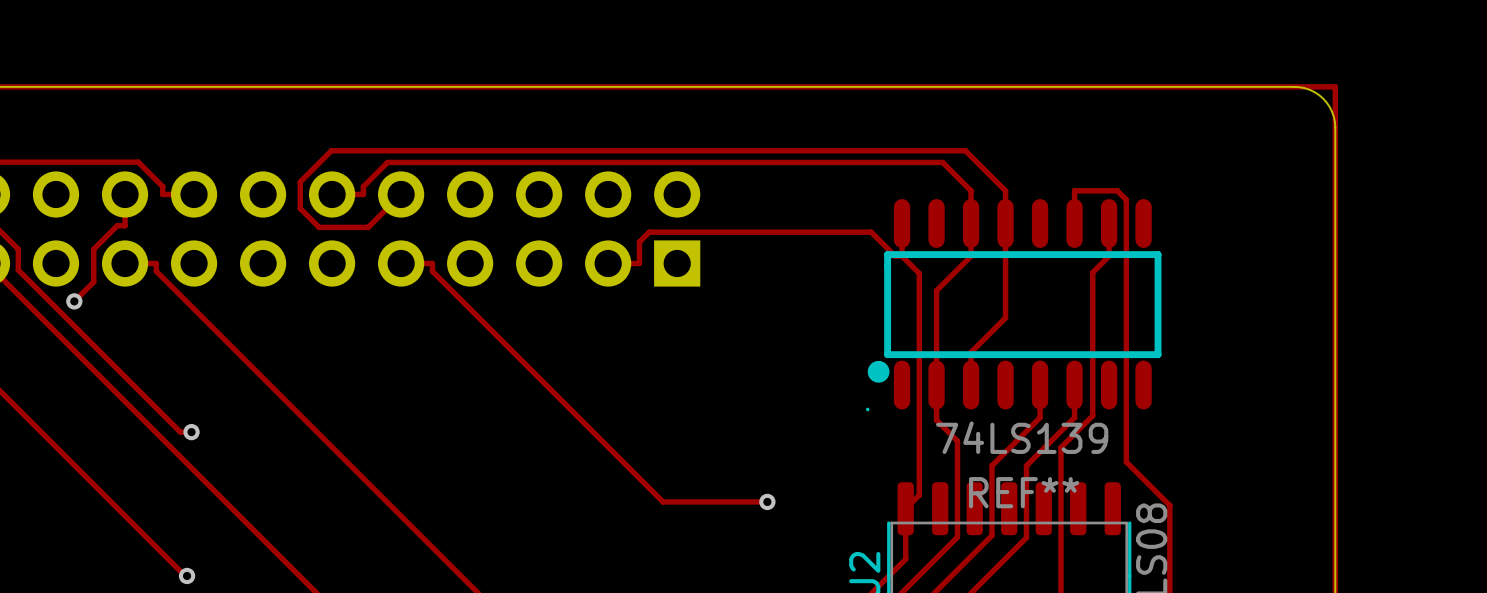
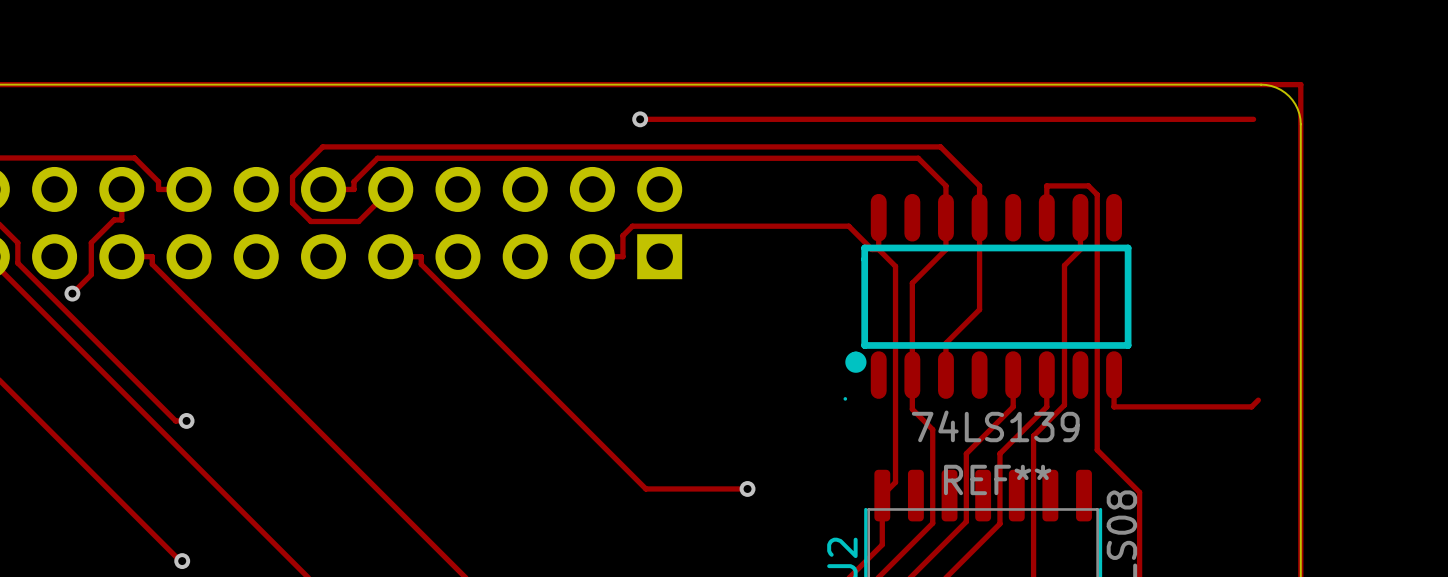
track: none -> (640, 119) (1253, 119)
via: none -> (640, 119)
track: none -> (1114, 375) (1114, 406) (1251, 406) (1258, 400)

